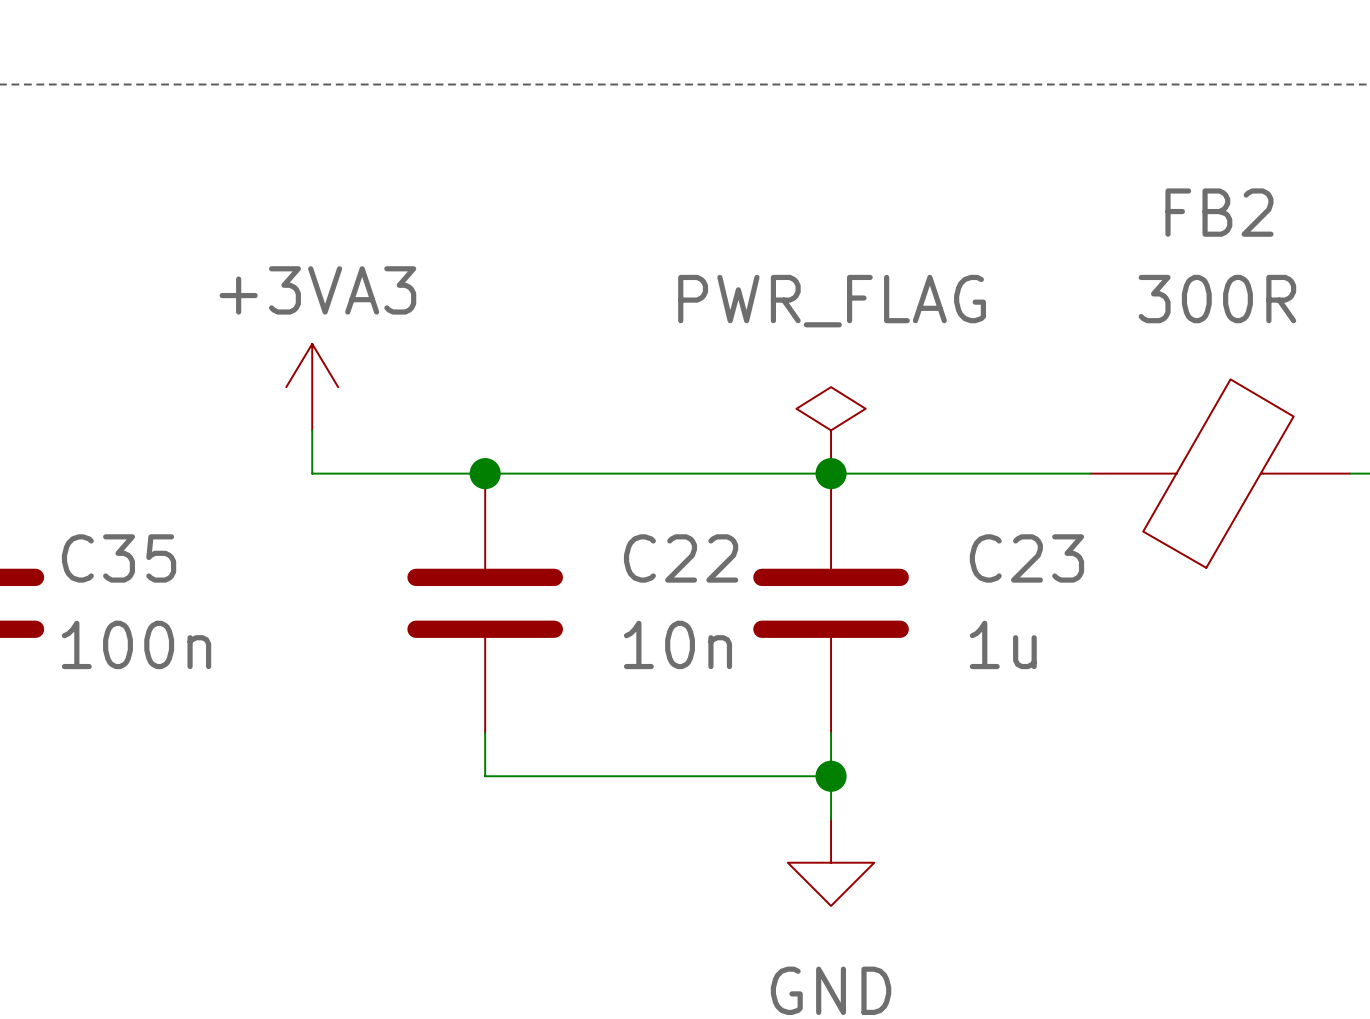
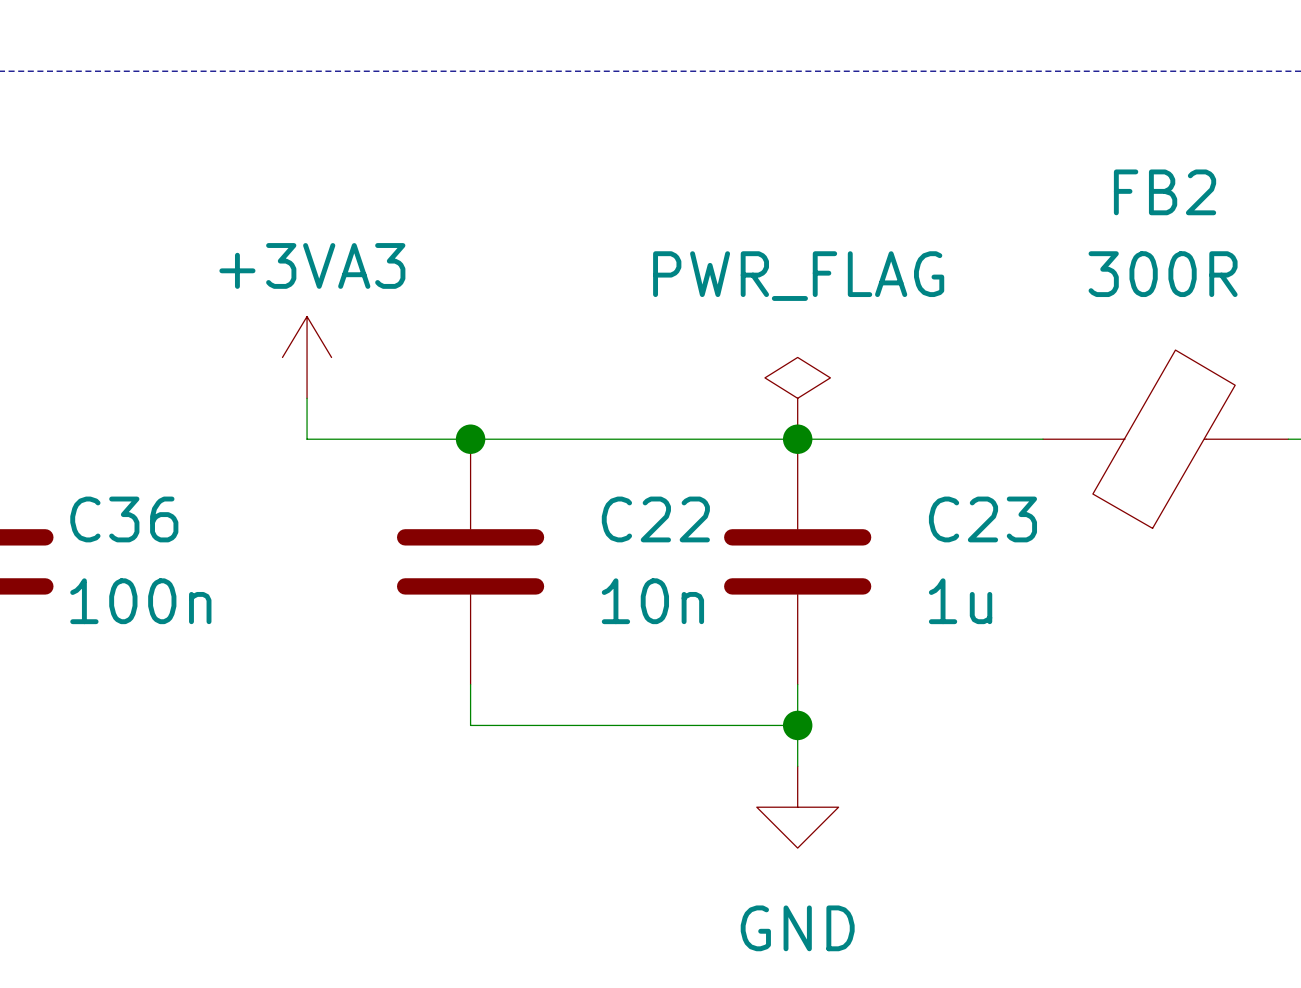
C35 name: C35 (119, 558) -> C36 (124, 519)

